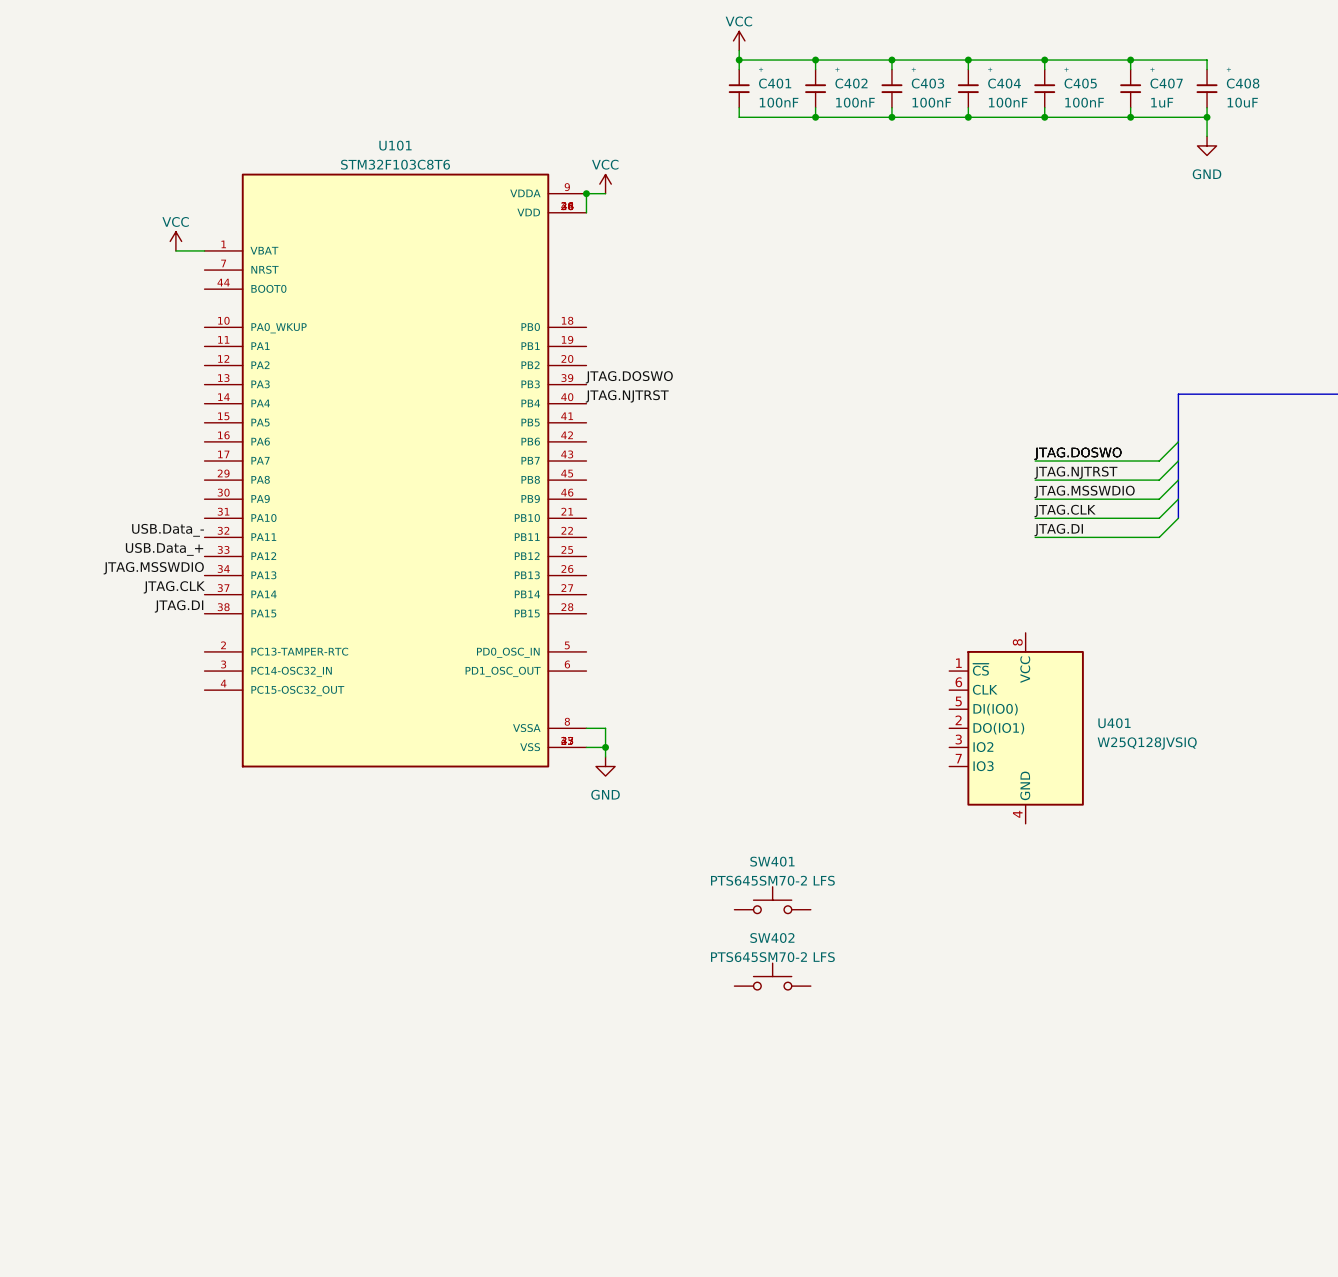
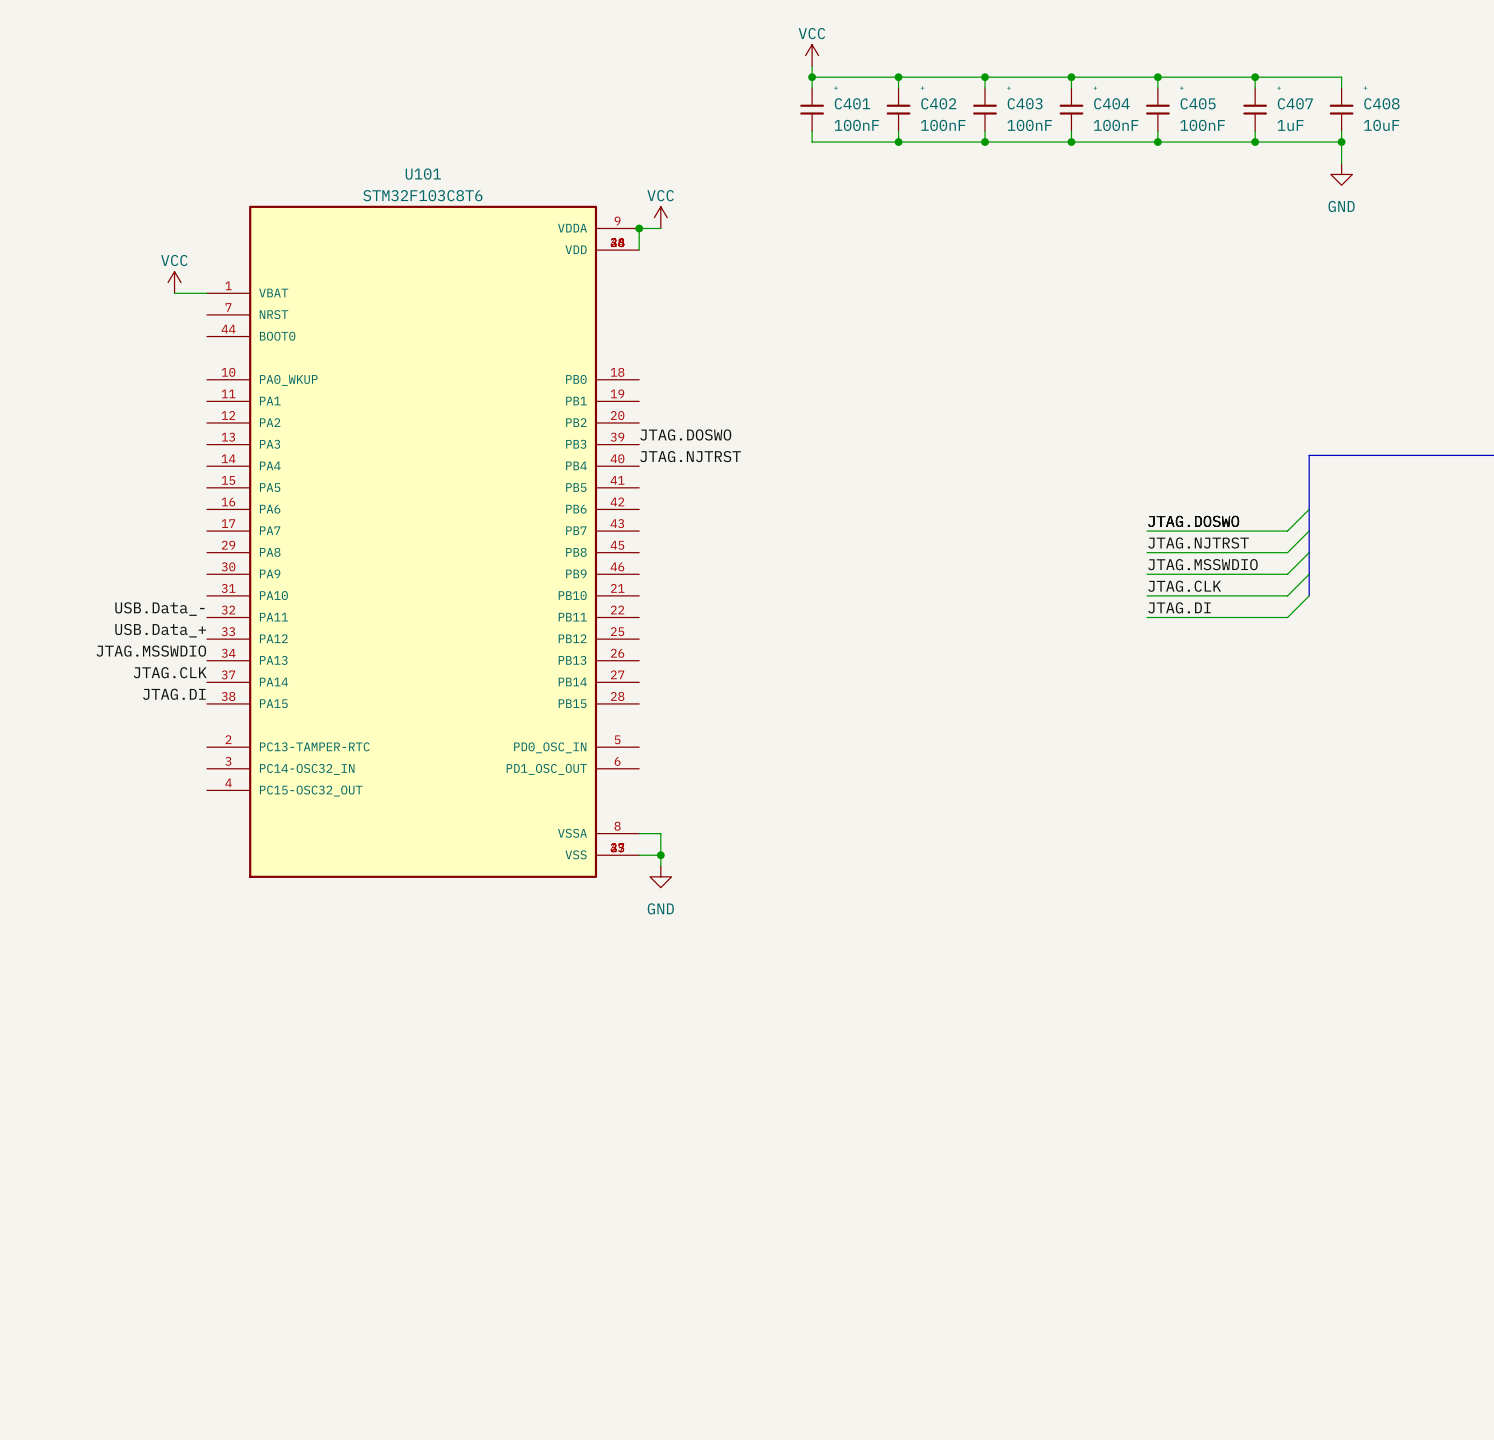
U401: W25Q128JVSIQ (1016, 728) -> none
SW401: PTS645SM70-2 LFS (772, 900) -> none
SW402: PTS645SM70-2 LFS (772, 976) -> none

